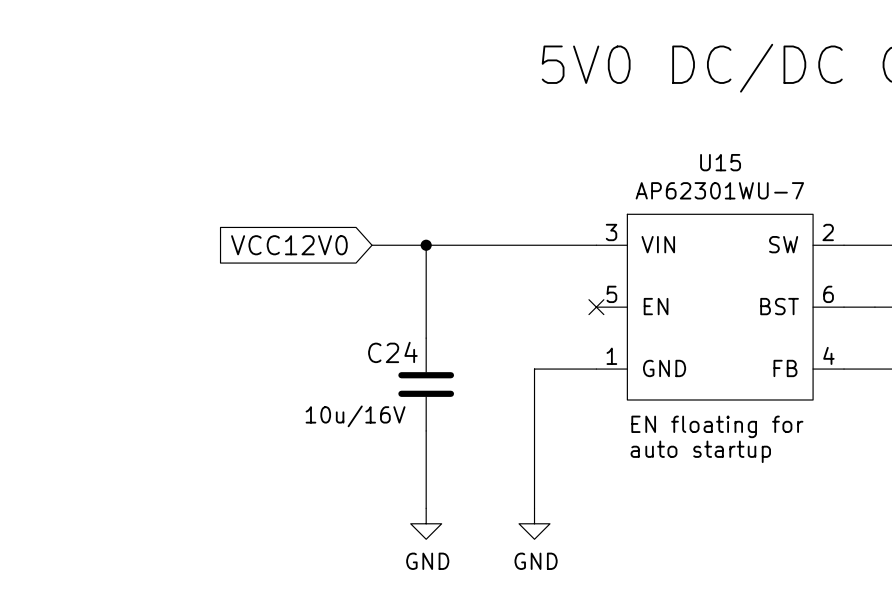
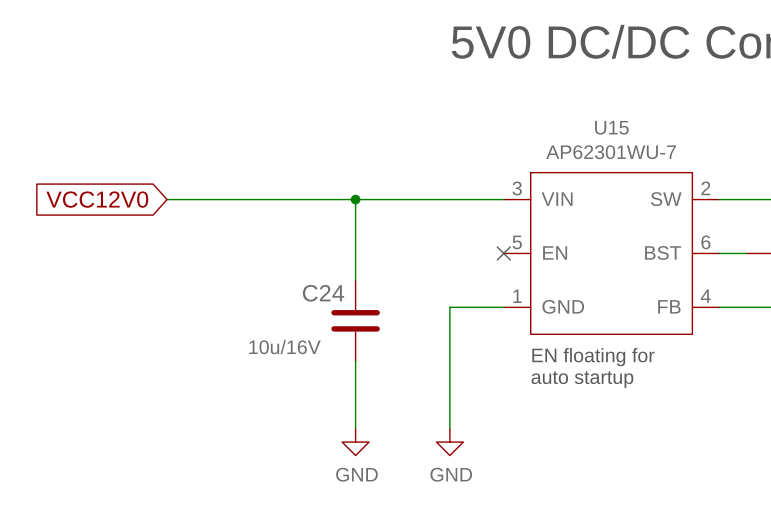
wire: none -> (166, 199) (308, 199)
global label position: VCC12V0 (289, 245) -> VCC12V0 (97, 199)

